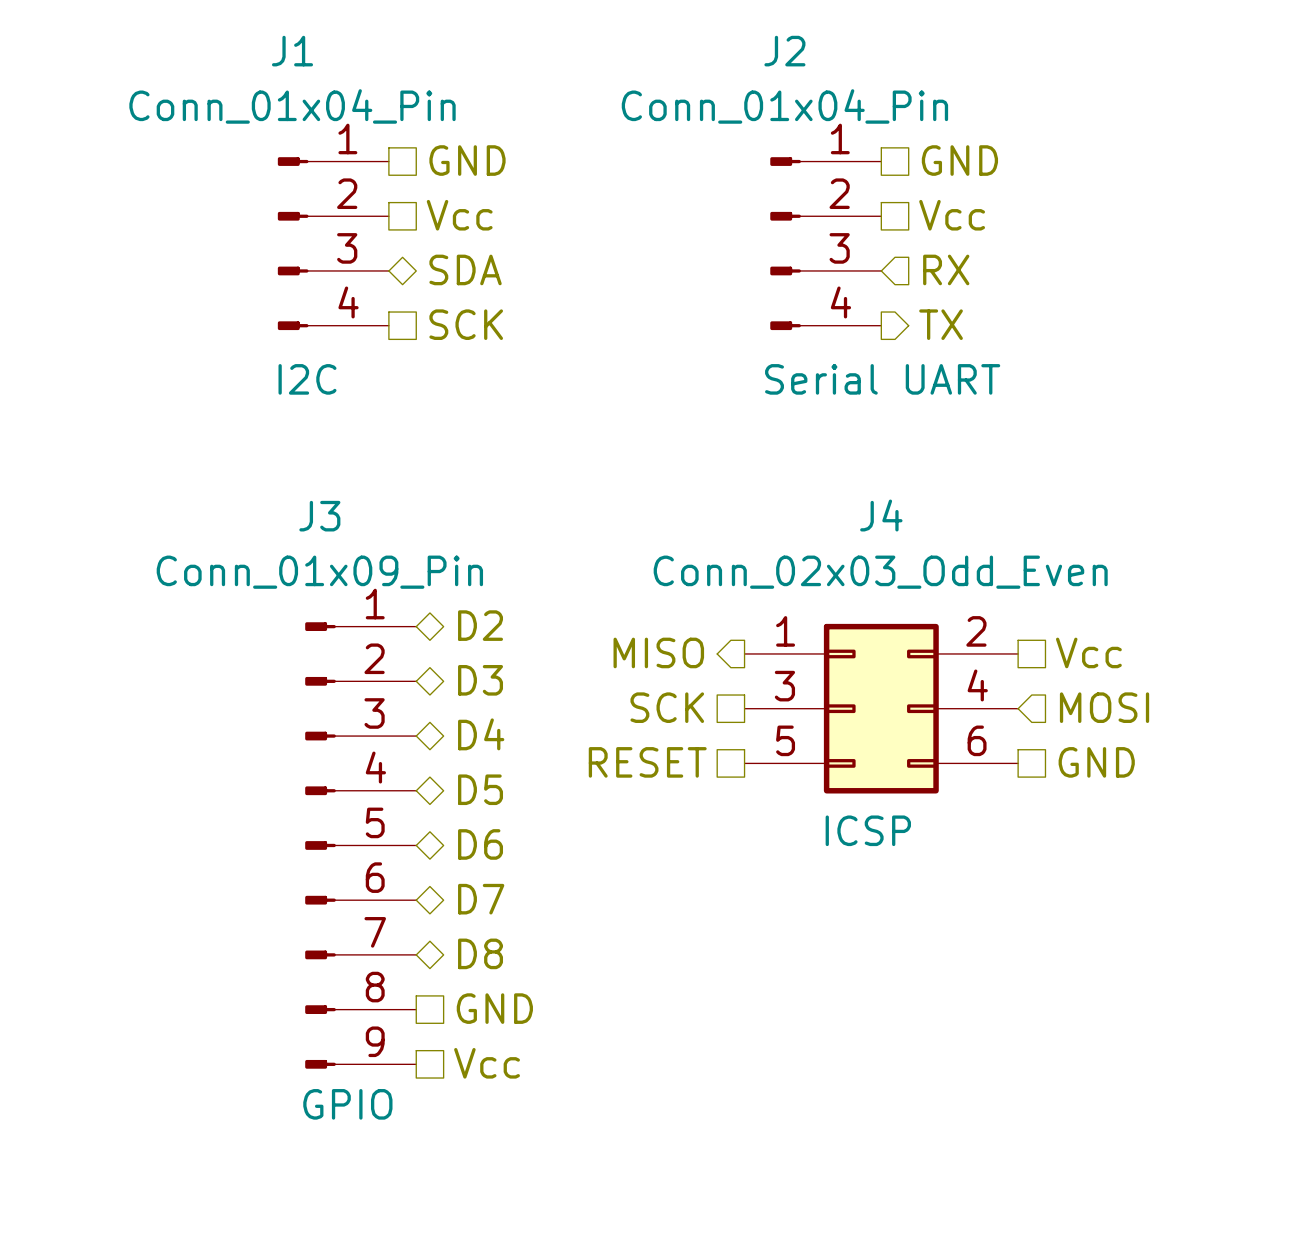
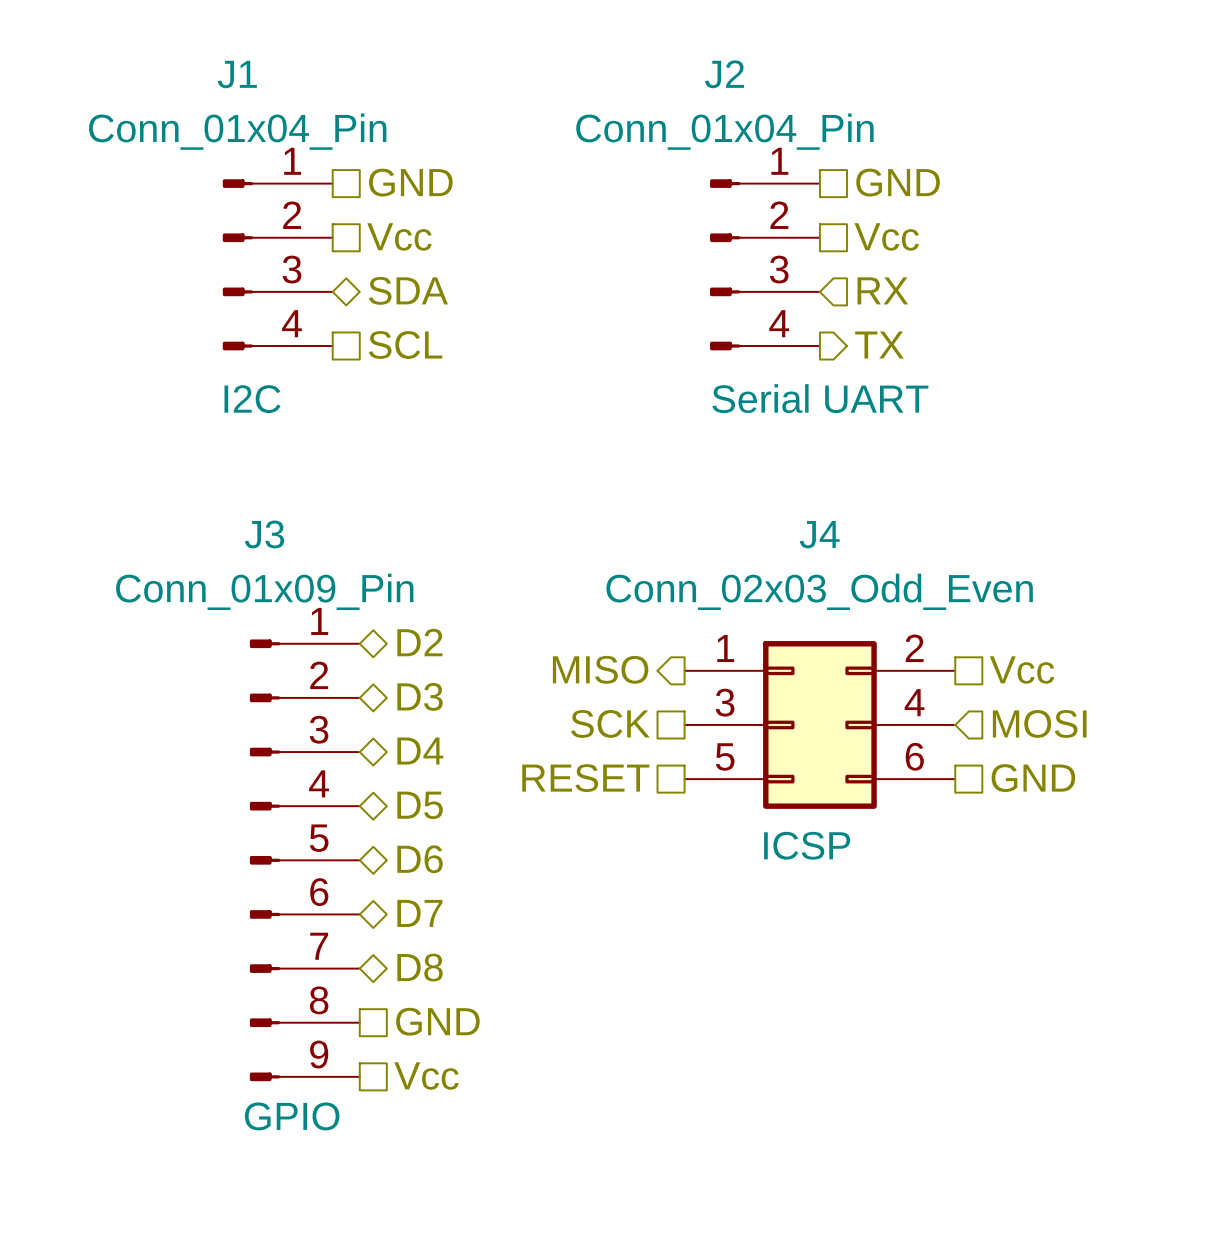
hierarchical label: SCK (466, 324) -> SCL (405, 345)

